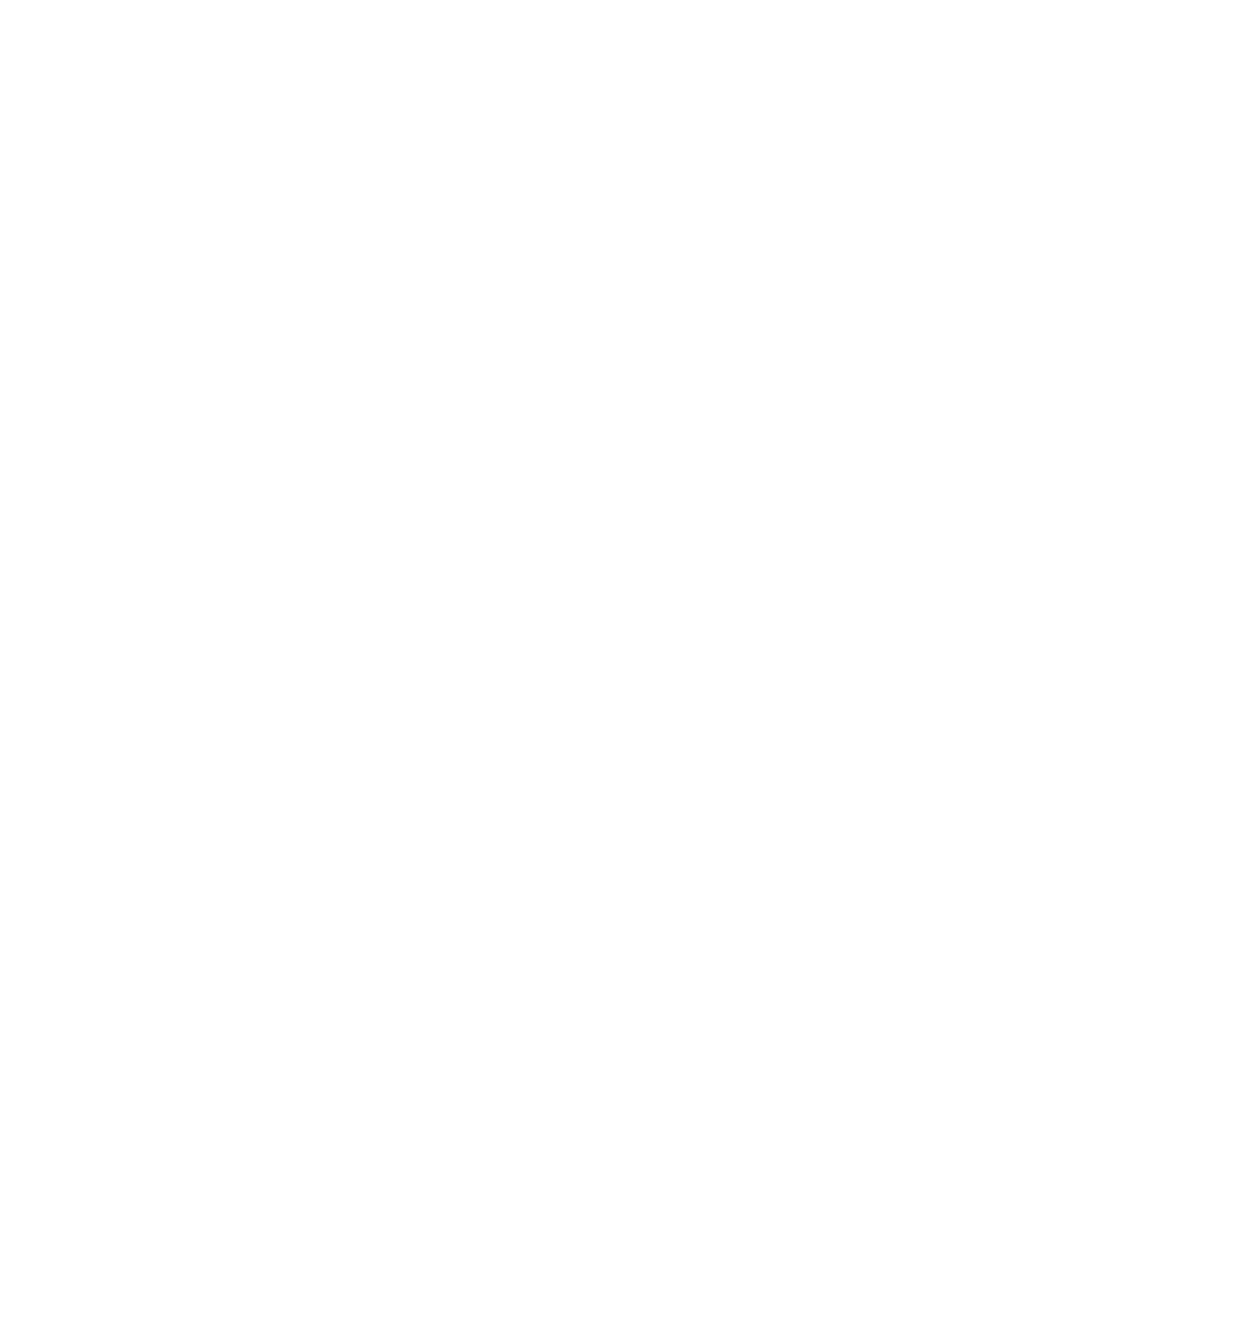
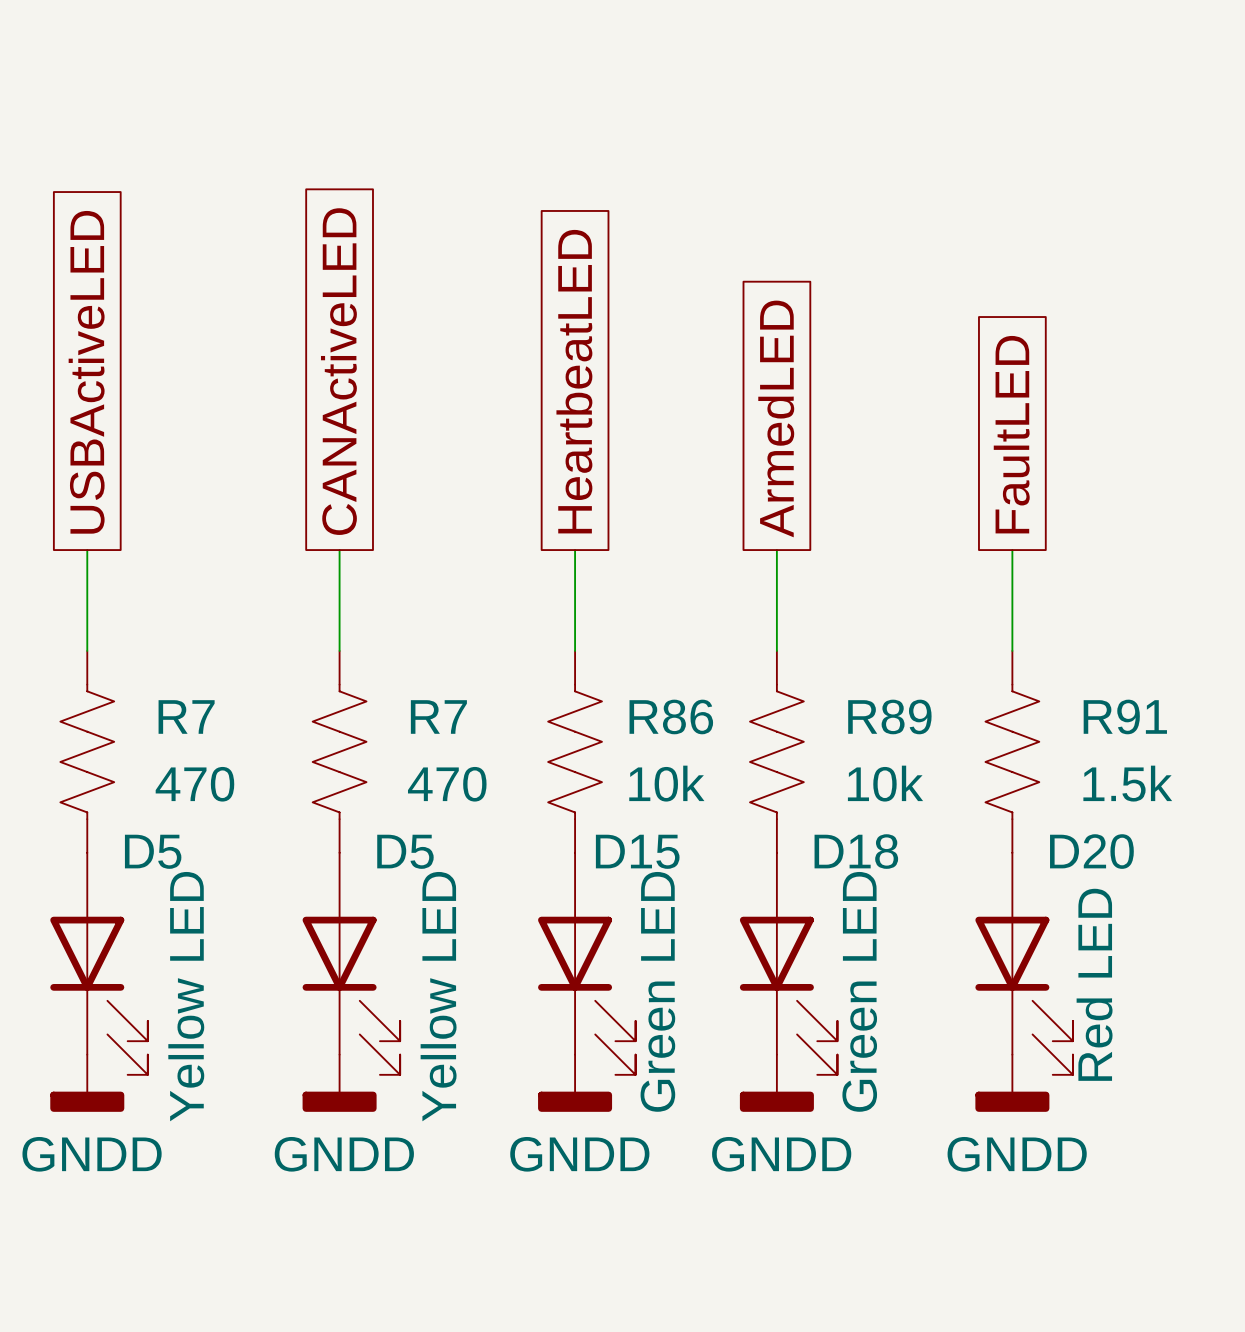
global label: none -> USBActiveLED (86, 372)
global label: none -> CANActiveLED (338, 371)
global label: none -> HeartbeatLED (574, 381)
global label: none -> FaultLED (1011, 434)
global label: none -> ArmedLED (776, 418)
wire: none -> (87, 550) (87, 650)
wire: none -> (339, 550) (339, 650)
wire: none -> (575, 550) (575, 650)
wire: none -> (776, 550) (776, 650)
wire: none -> (1012, 550) (1012, 650)
R7: none -> 470 (87, 751)
R7: none -> 470 (339, 751)
R86: none -> 10k (575, 751)
R89: none -> 10k (776, 751)
R91: none -> 1.5k (1012, 751)
D5: none -> Yellow LED (99, 963)
D5: none -> Yellow LED (351, 963)
D15: none -> Green LED (586, 963)
D18: none -> Green LED (788, 963)
D20: none -> Red LED (1024, 963)
power symbol: none -> GNDD (87, 1083)
power symbol: none -> GNDD (339, 1083)
power symbol: none -> GNDD (575, 1083)
power symbol: none -> GNDD (776, 1083)
power symbol: none -> GNDD (1012, 1083)

